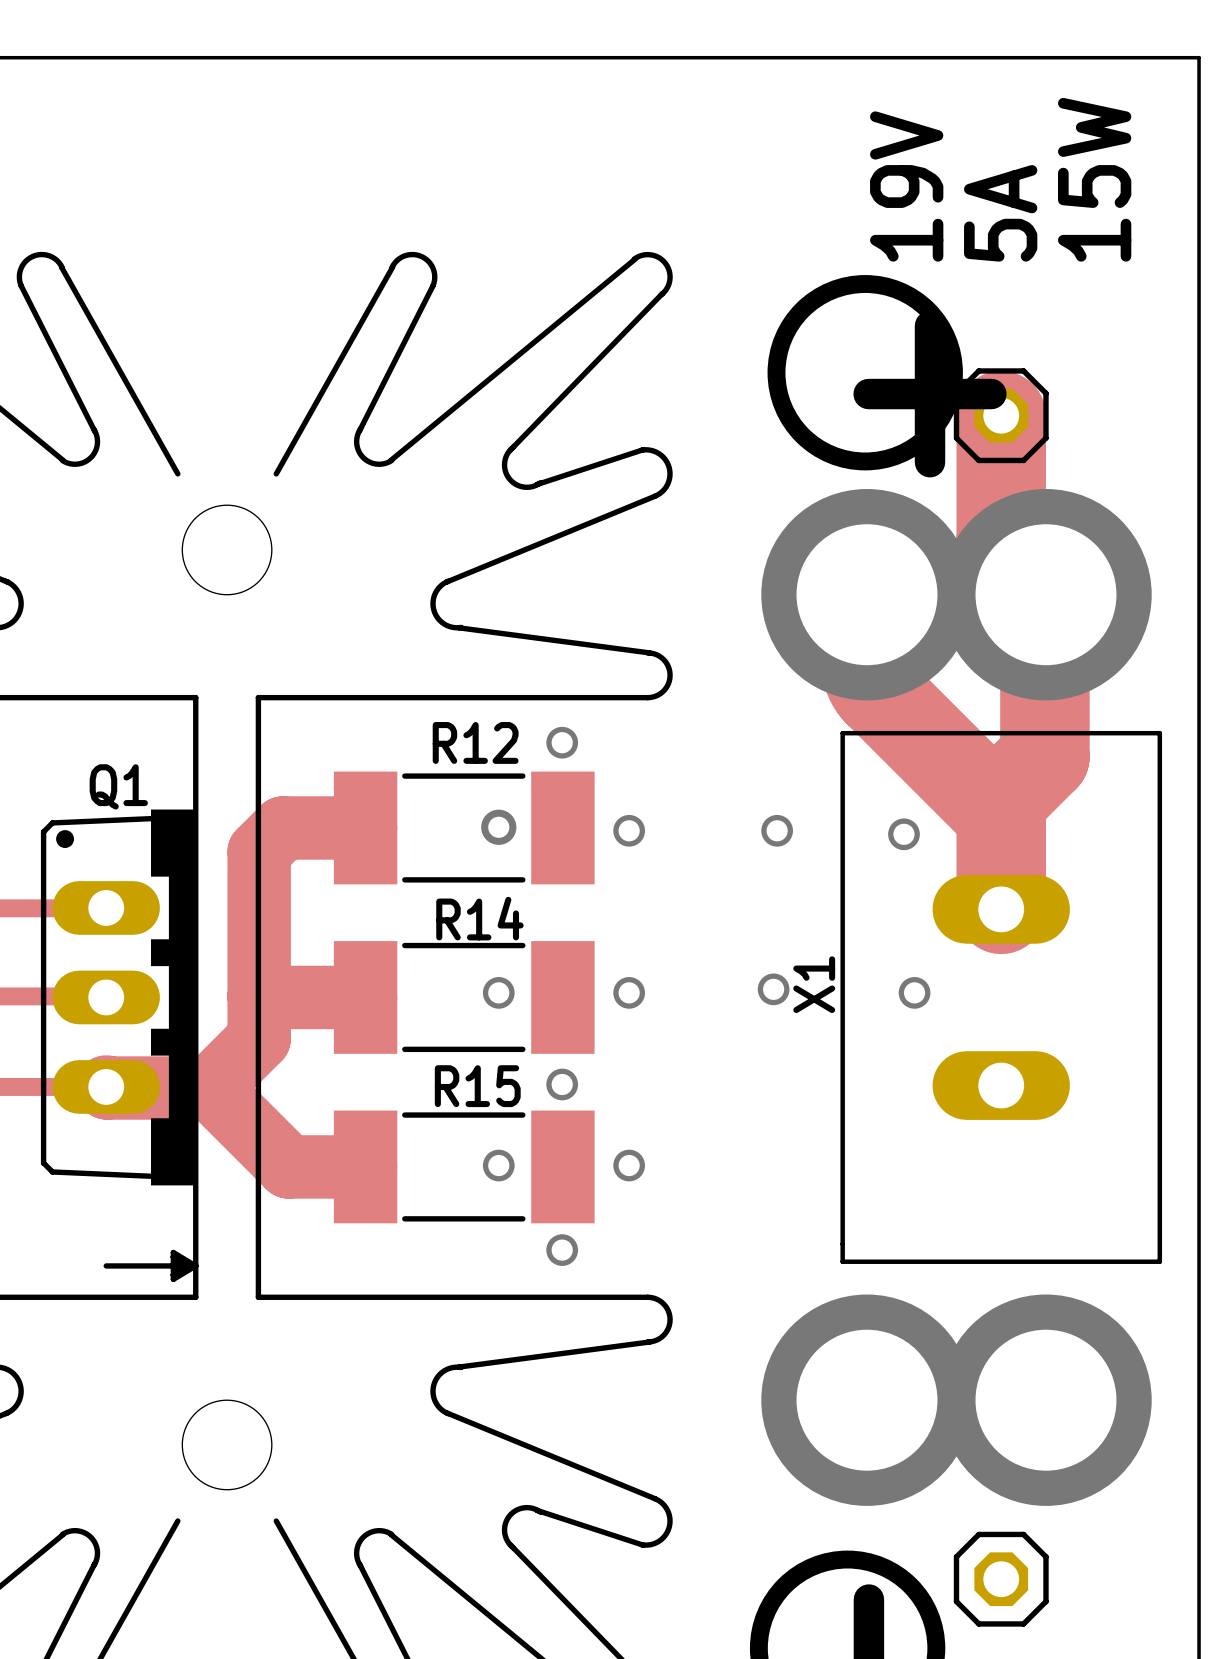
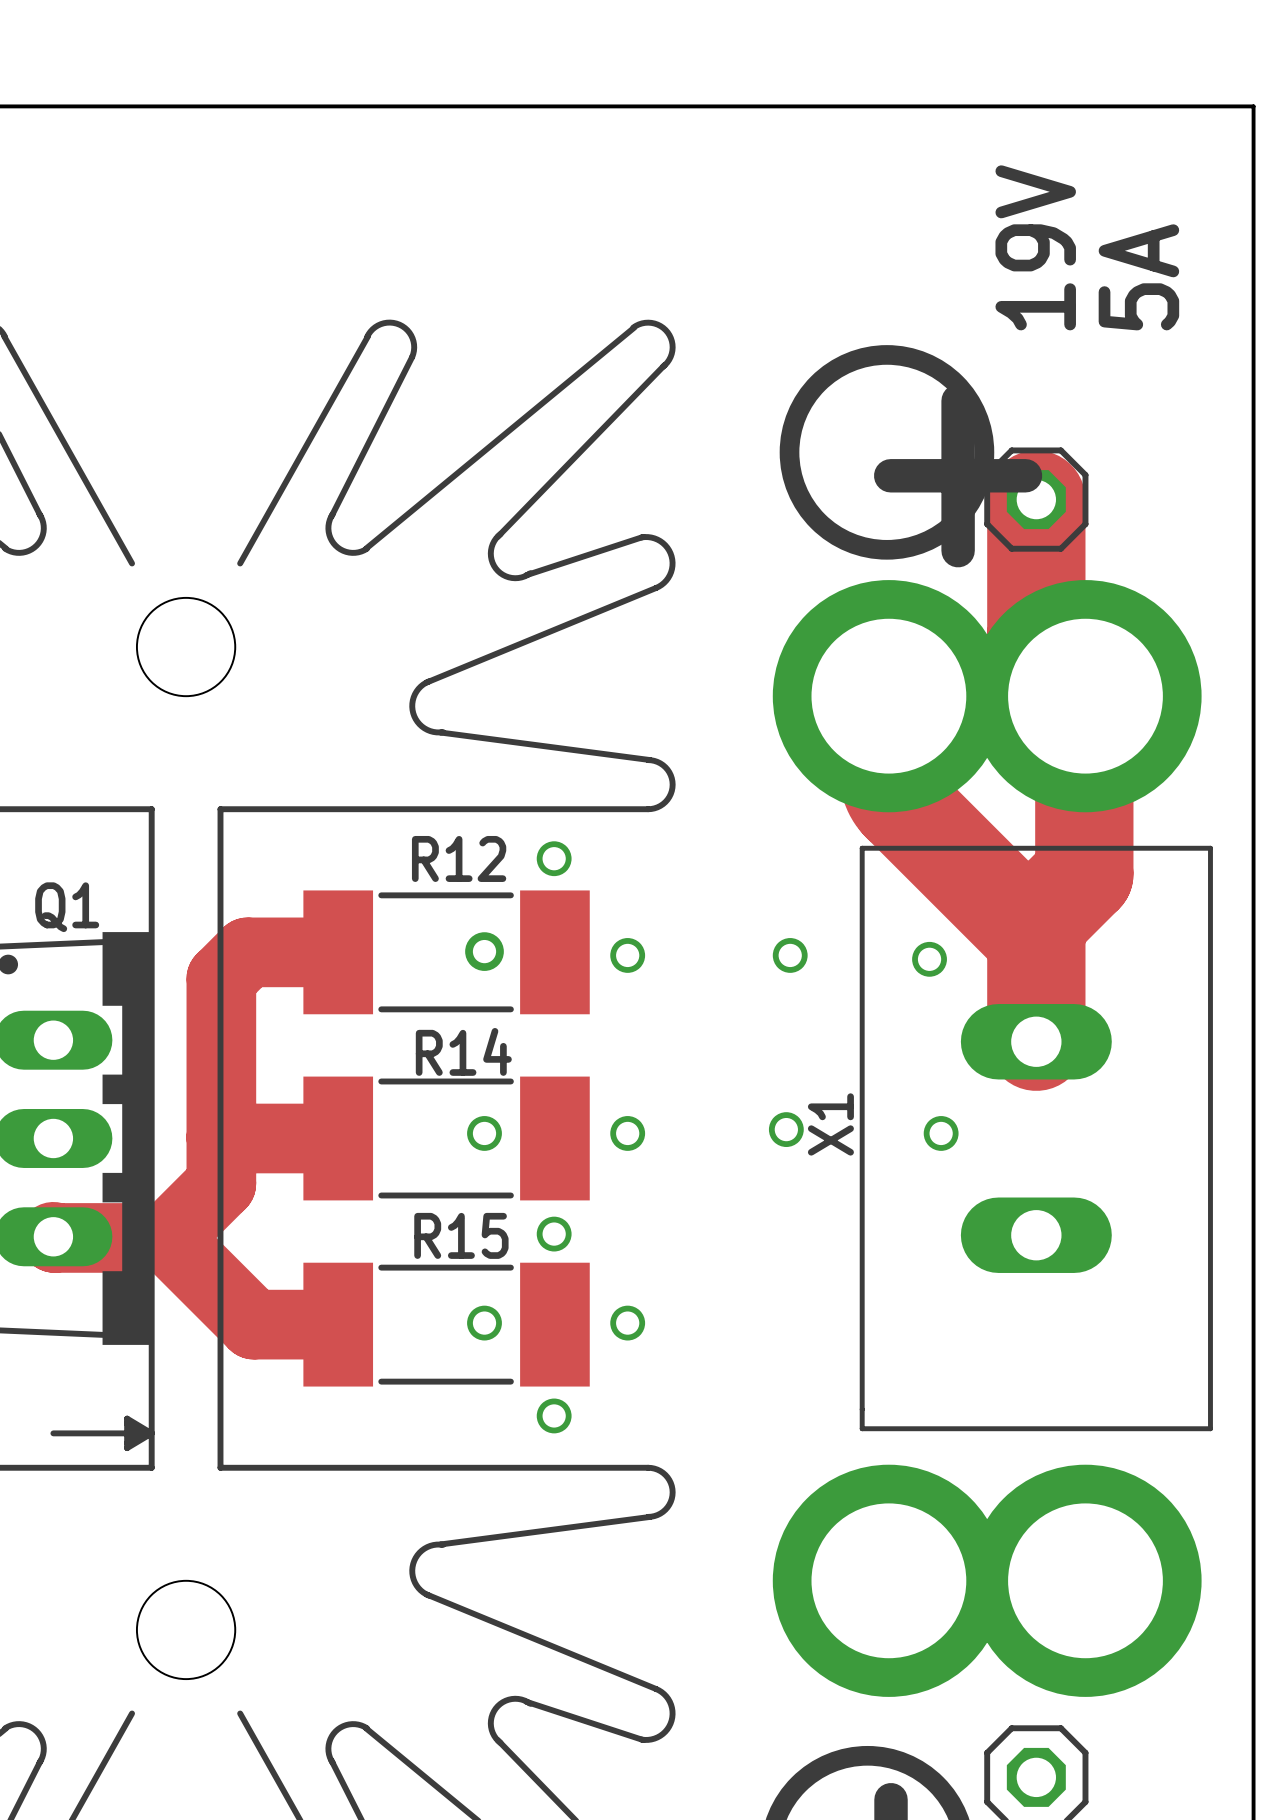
text: 15W (1094, 179) -> 5A (1138, 277)
text: 19V (906, 186) -> none
text: 5A (1000, 213) -> 19V (1035, 247)

